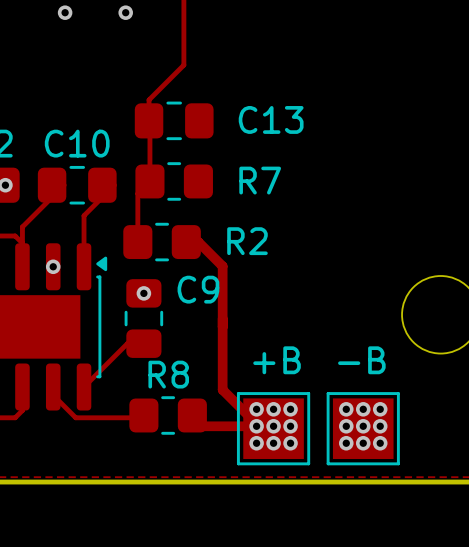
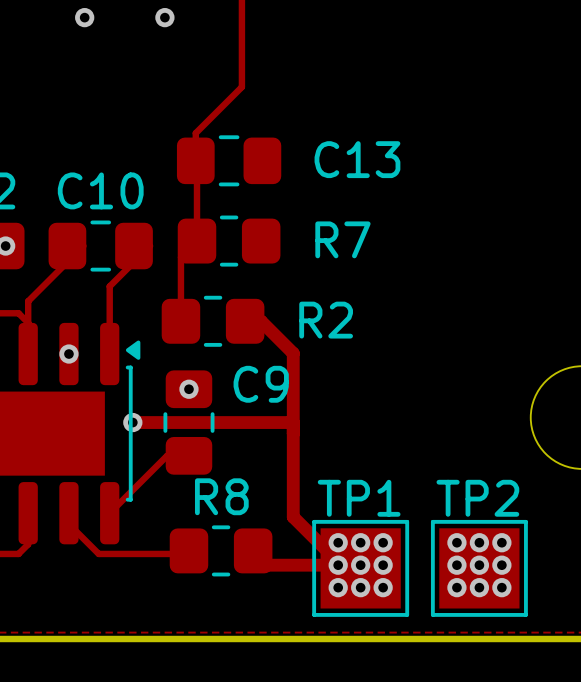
track: none -> (132, 422) (293, 422)
via: none -> (132, 422)
text: +B (277, 360) -> none
text: -B (361, 360) -> none
TP1 name: none -> TP1 (359, 498)
TP2 name: none -> TP2 (477, 498)

